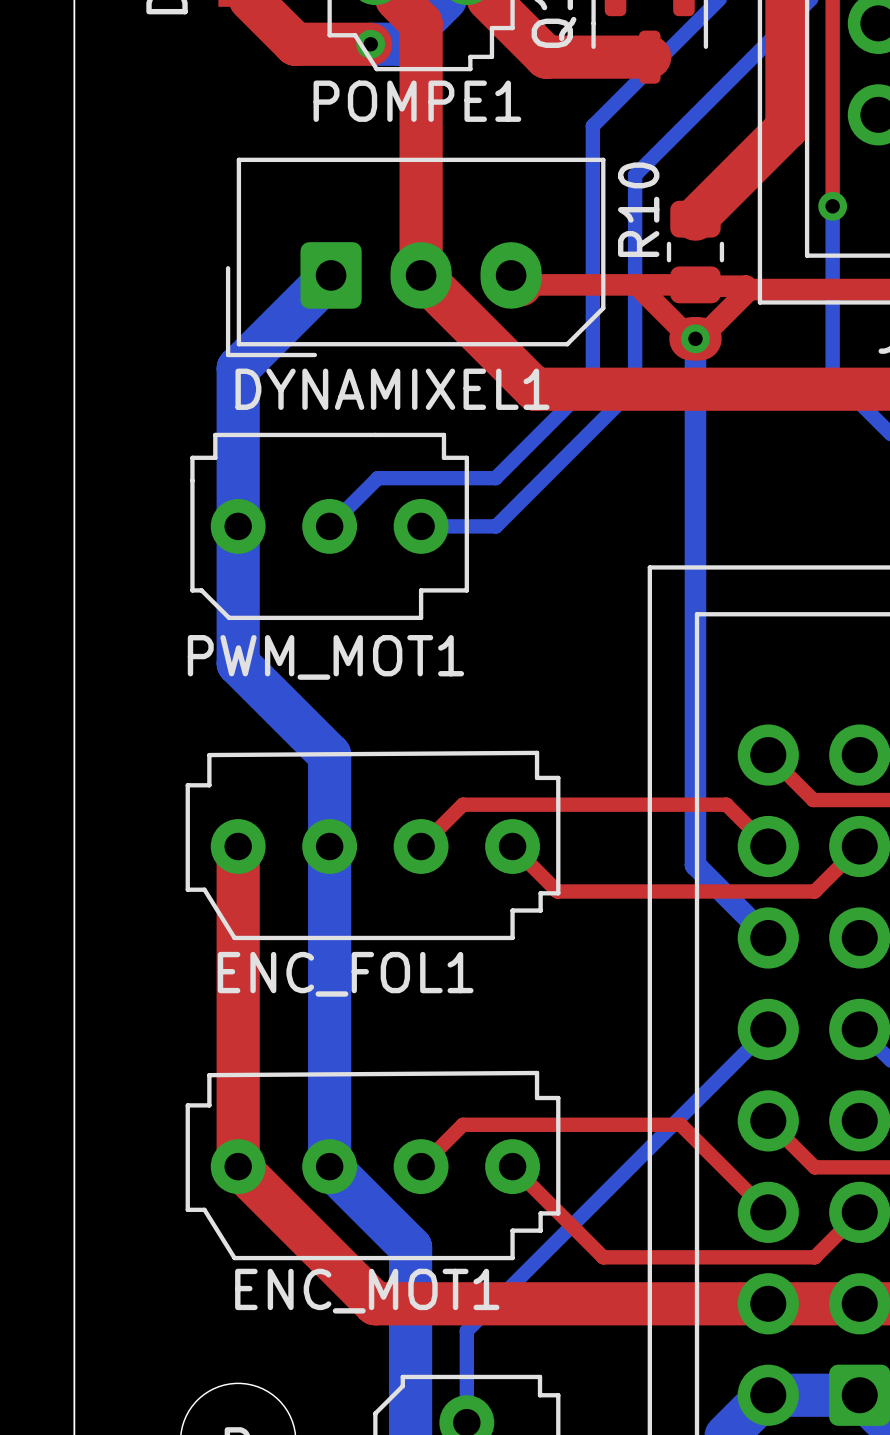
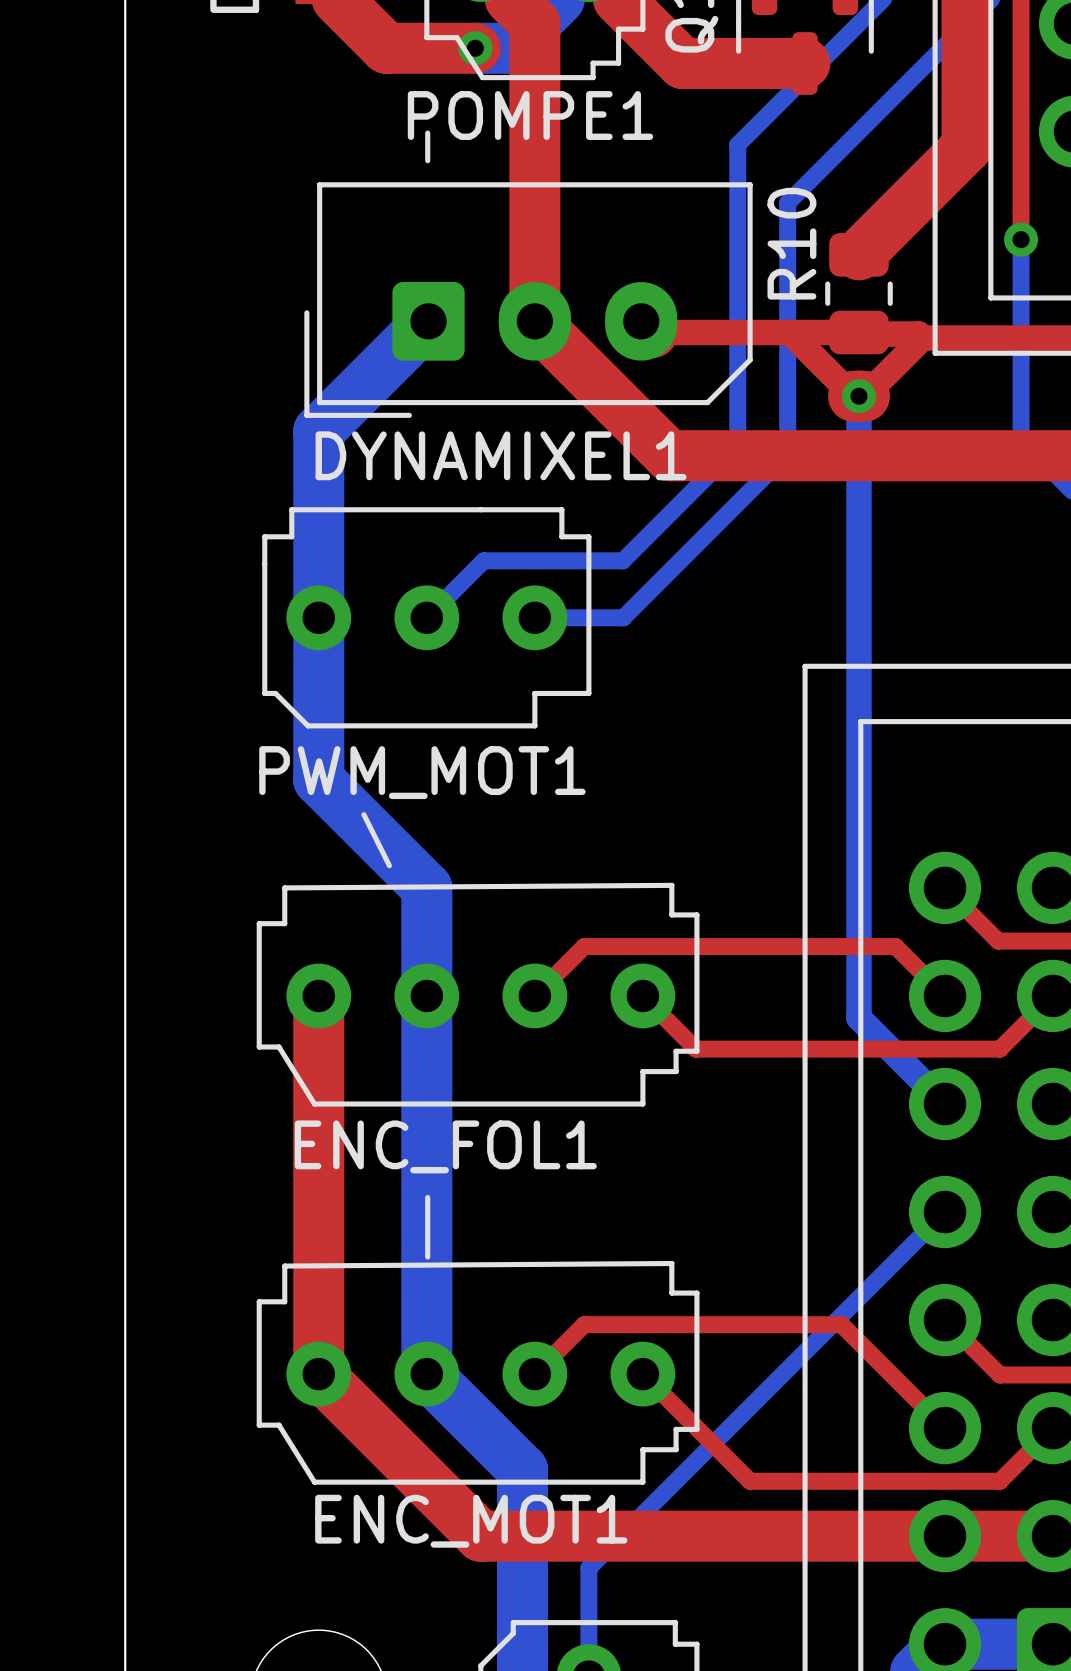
line: none -> (427, 133) (427, 160)
line: none -> (363, 814) (389, 865)
line: none -> (427, 1197) (427, 1257)

